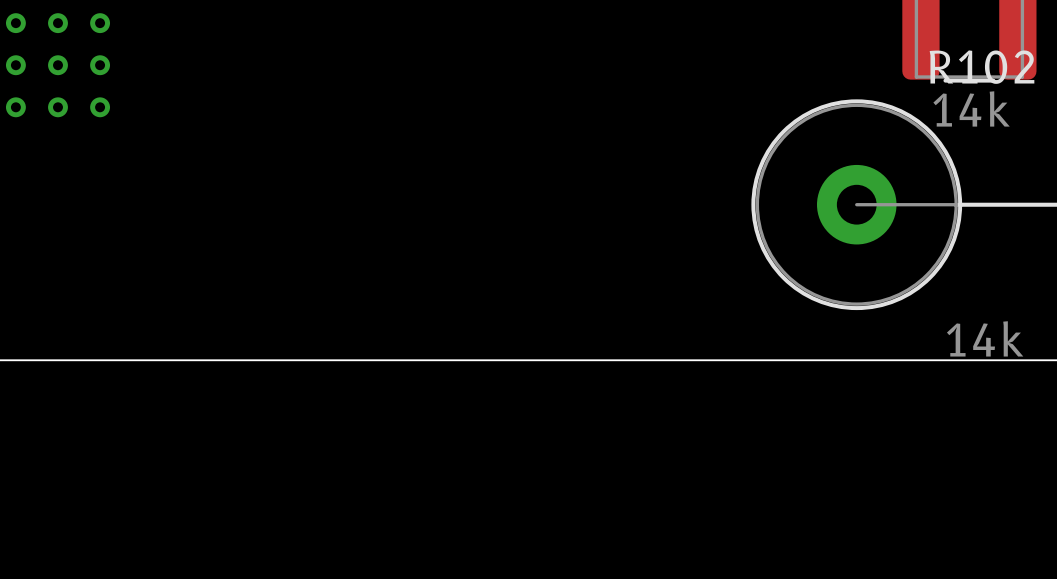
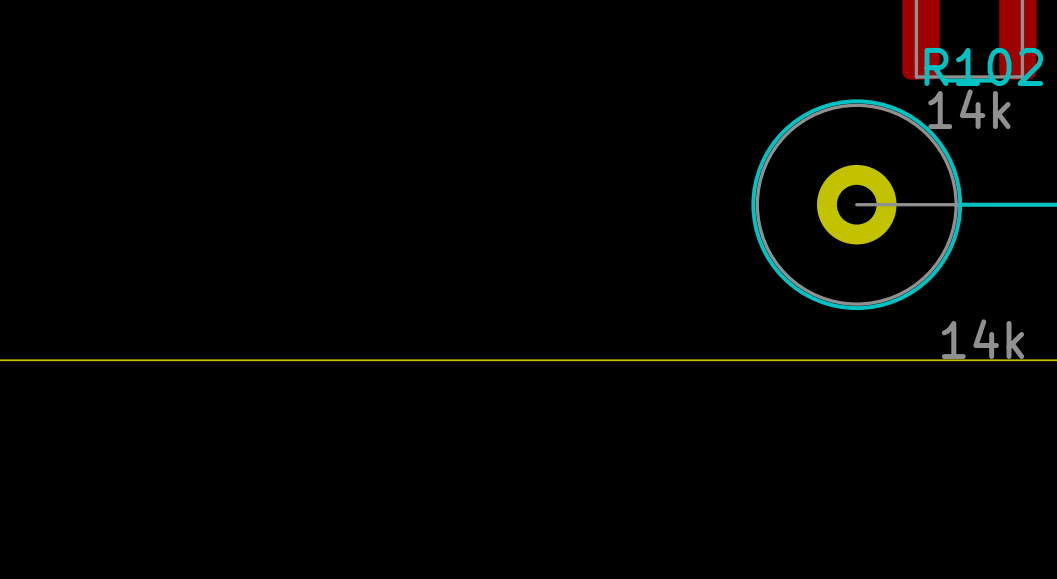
via: (15, 23) -> none
via: (57, 23) -> none
via: (100, 23) -> none
via: (15, 65) -> none
via: (57, 65) -> none
via: (100, 65) -> none
via: (15, 107) -> none
via: (57, 107) -> none
via: (100, 107) -> none

